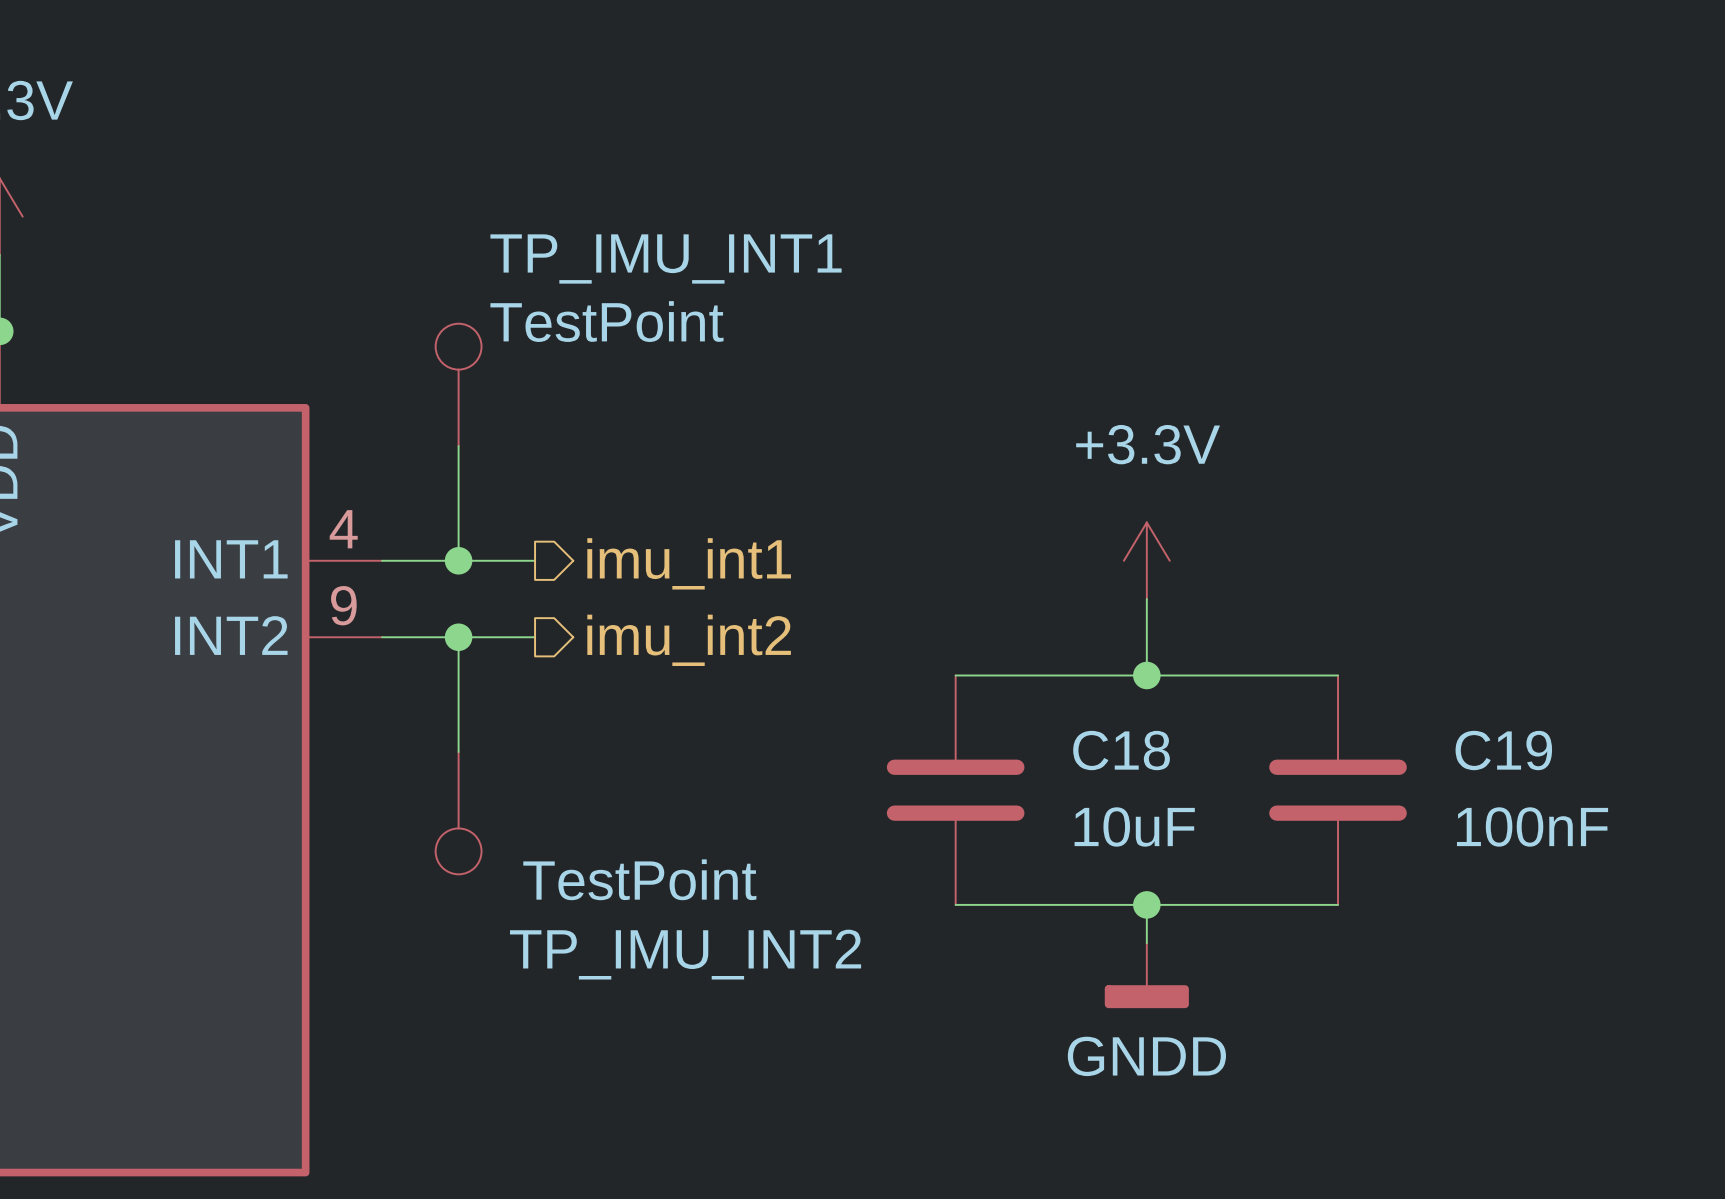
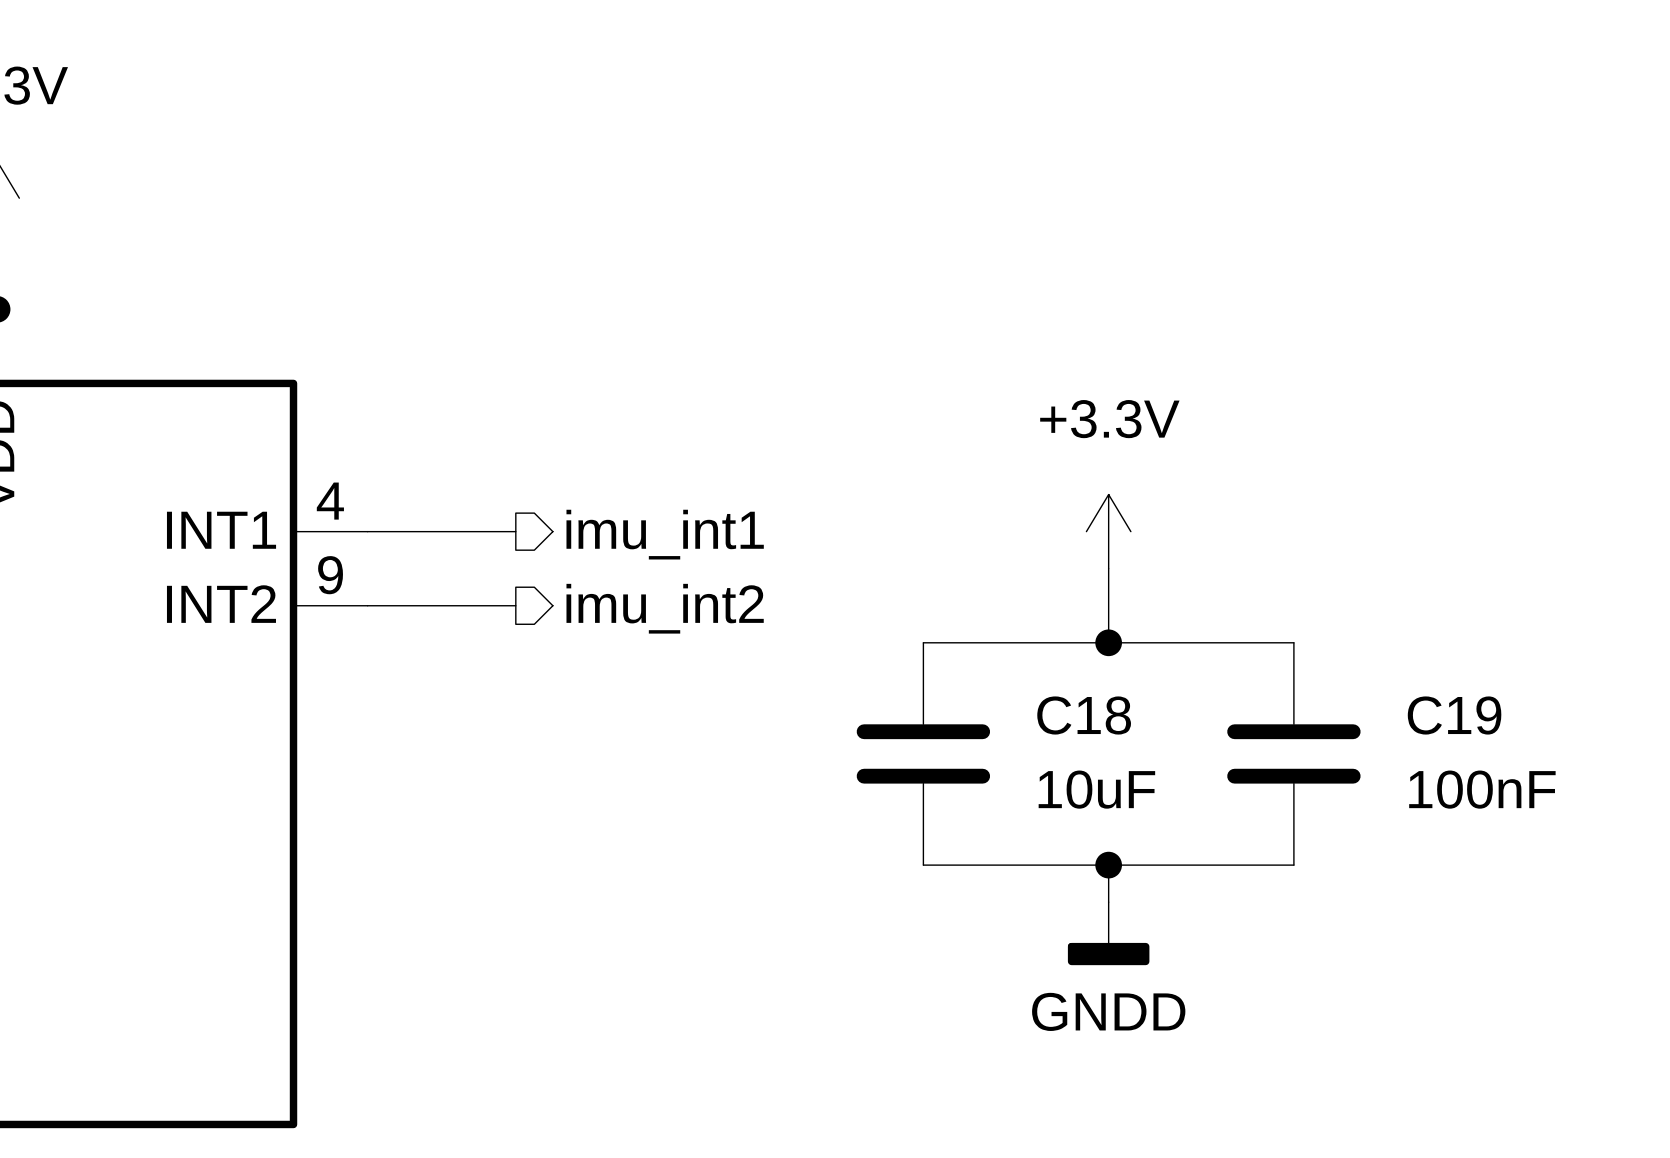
TP_IMU_INT1: TestPoint (458, 384) -> none
wire: (458, 446) (458, 560) -> none
junction: (458, 560) -> none
wire: (458, 637) (458, 751) -> none
junction: (458, 637) -> none
TP_IMU_INT2: TestPoint (458, 813) -> none

